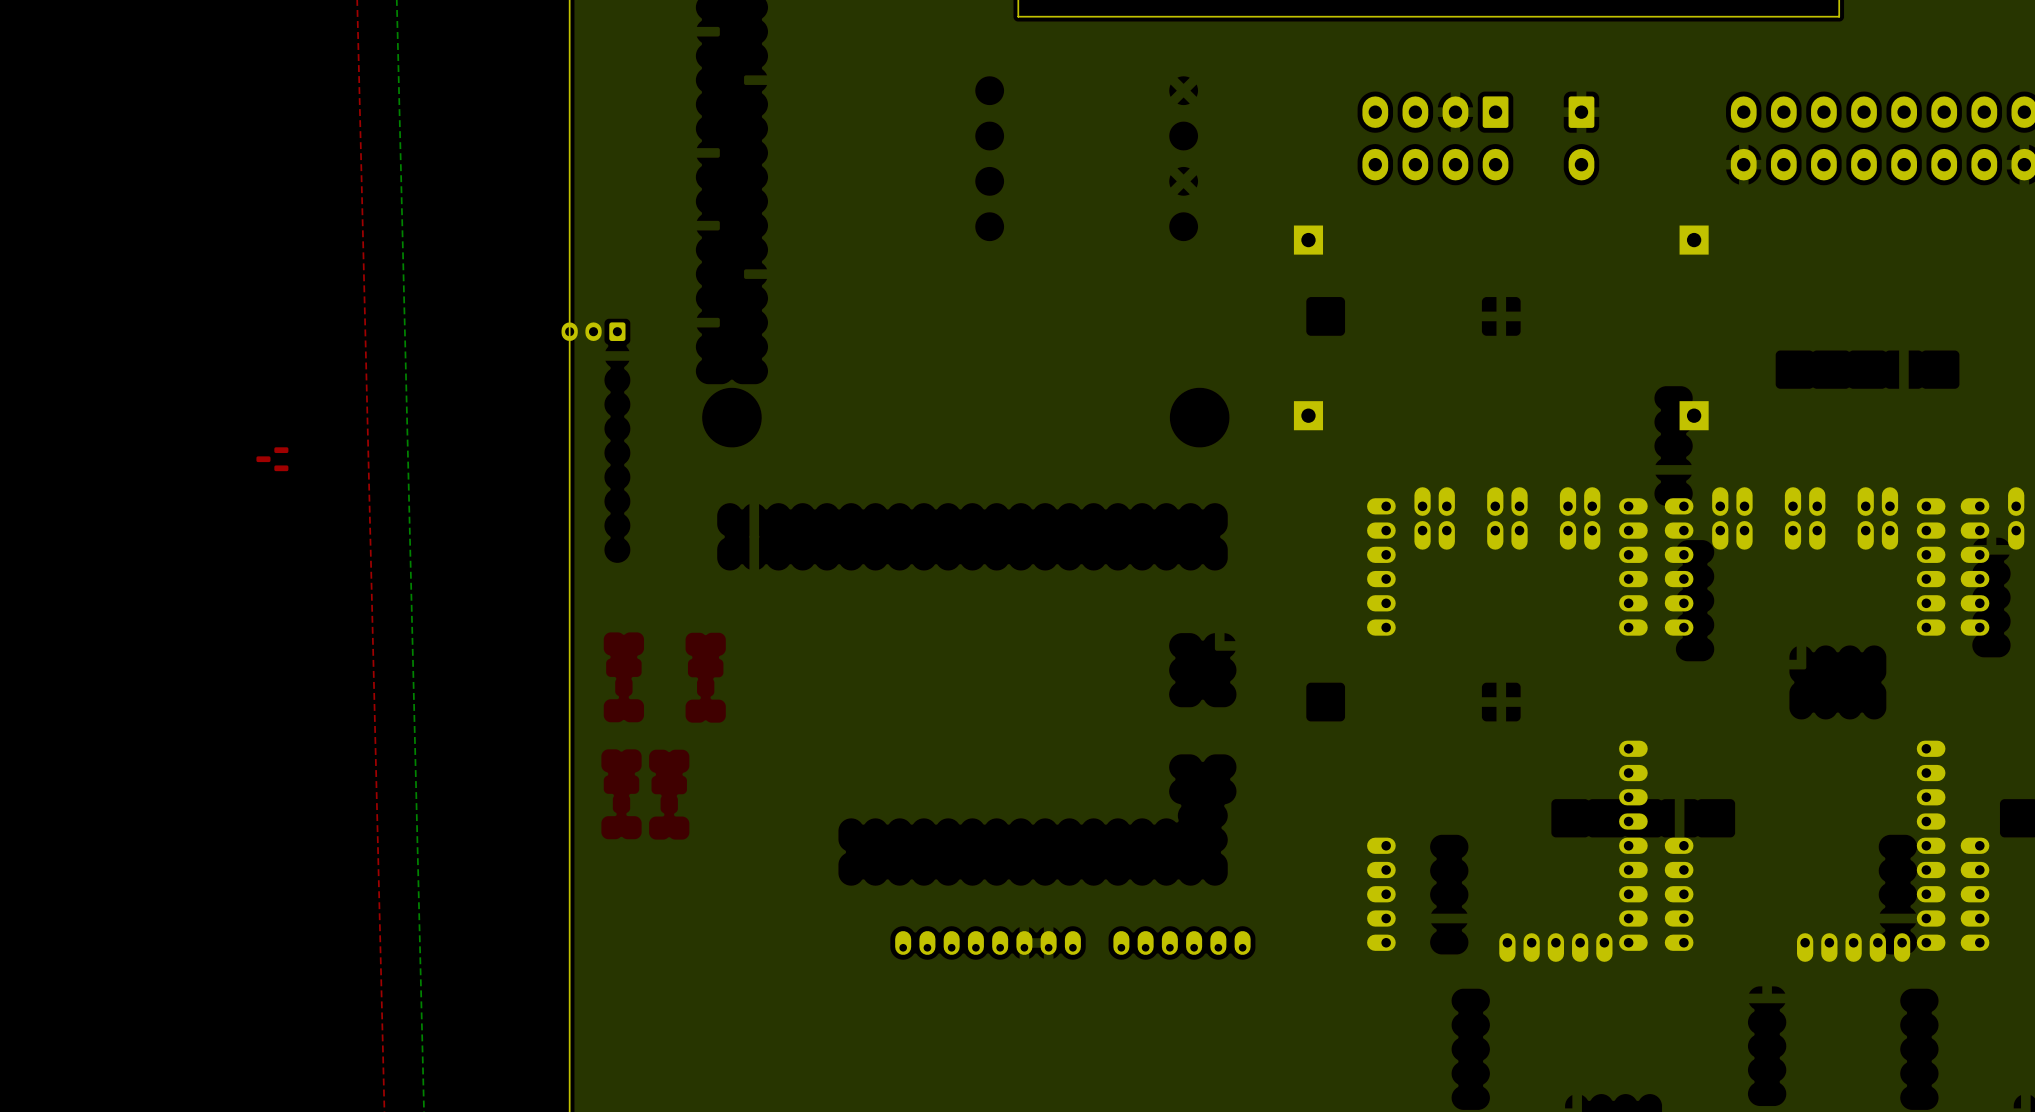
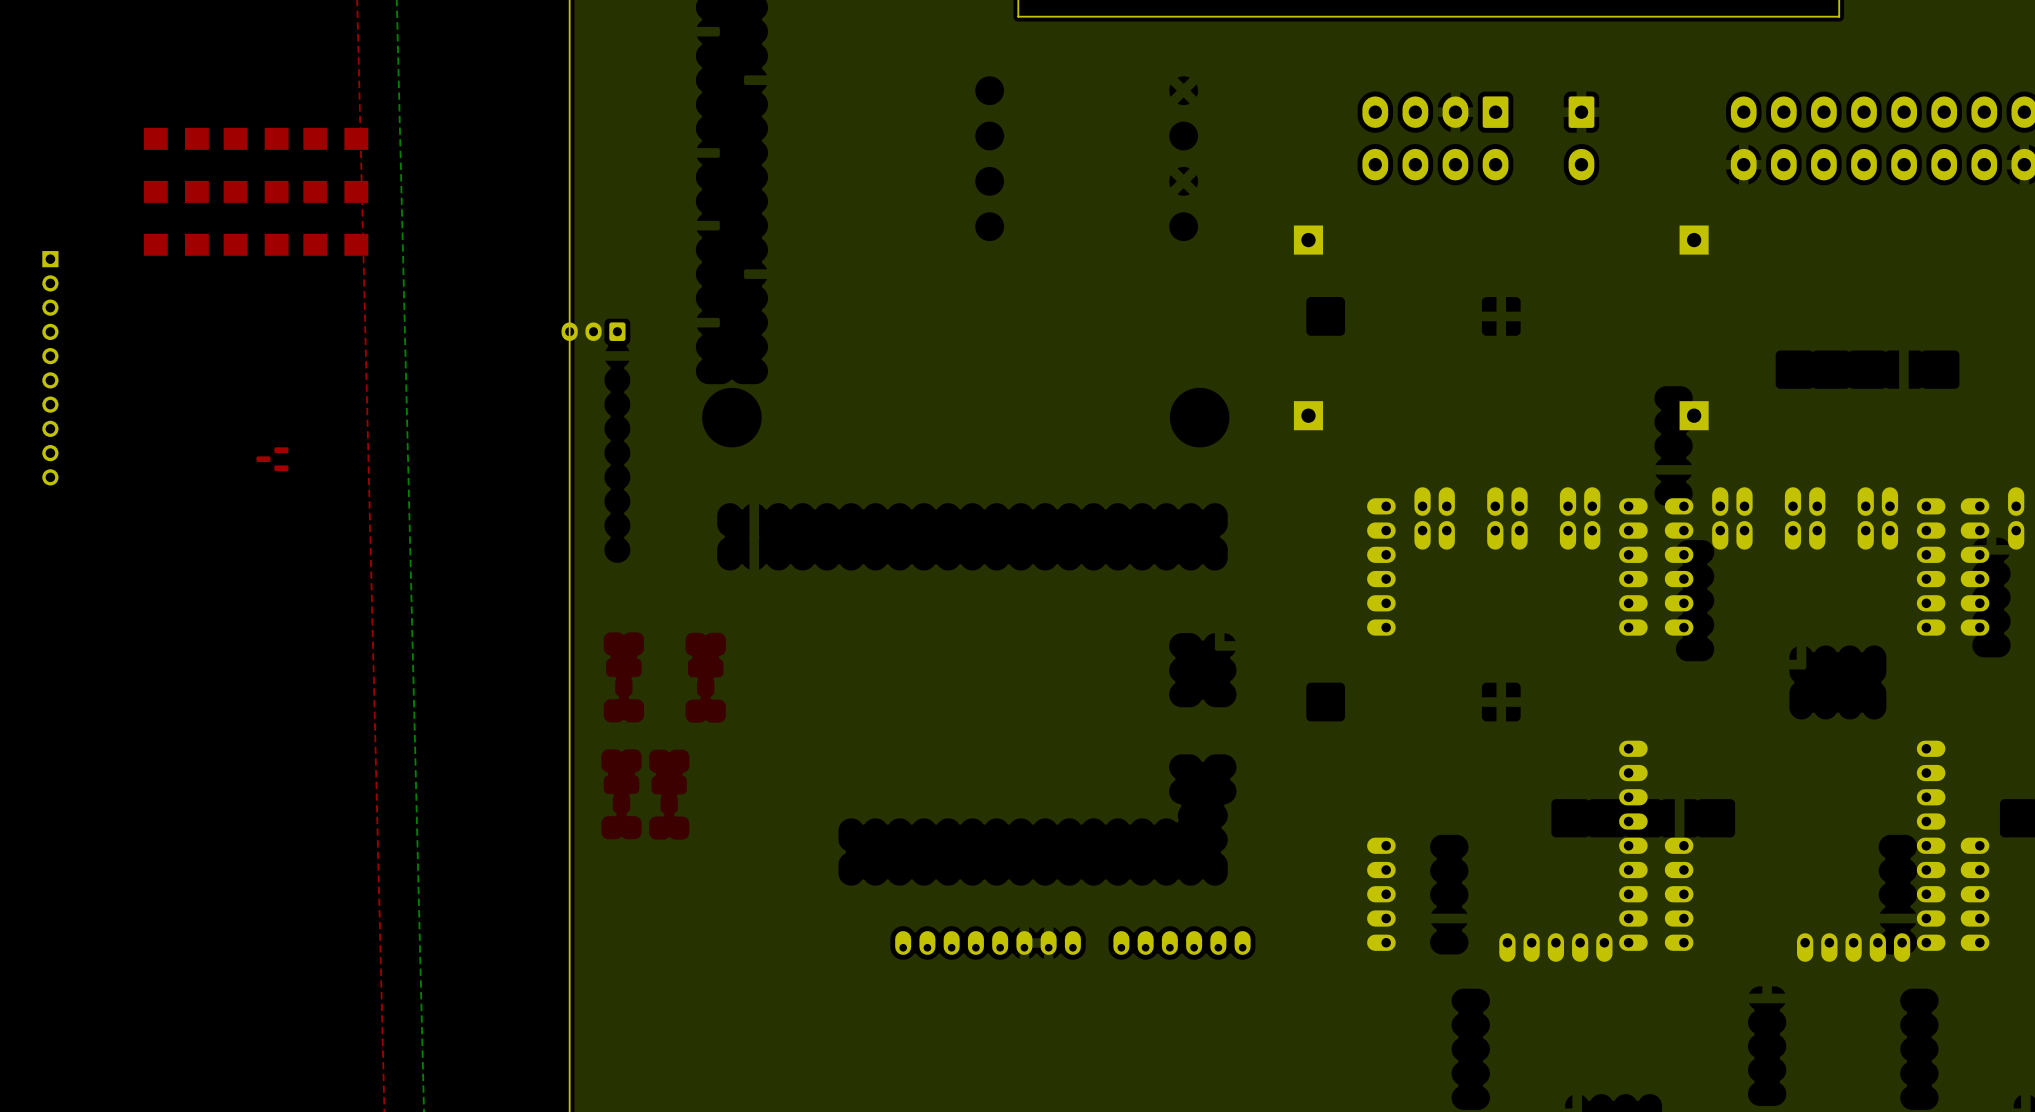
part: none -> (176, 138)
part: none -> (256, 138)
part: none -> (335, 138)
part: none -> (176, 191)
part: none -> (256, 191)
part: none -> (335, 191)
part: none -> (176, 244)
part: none -> (256, 244)
part: none -> (335, 244)
part: none -> (50, 368)

